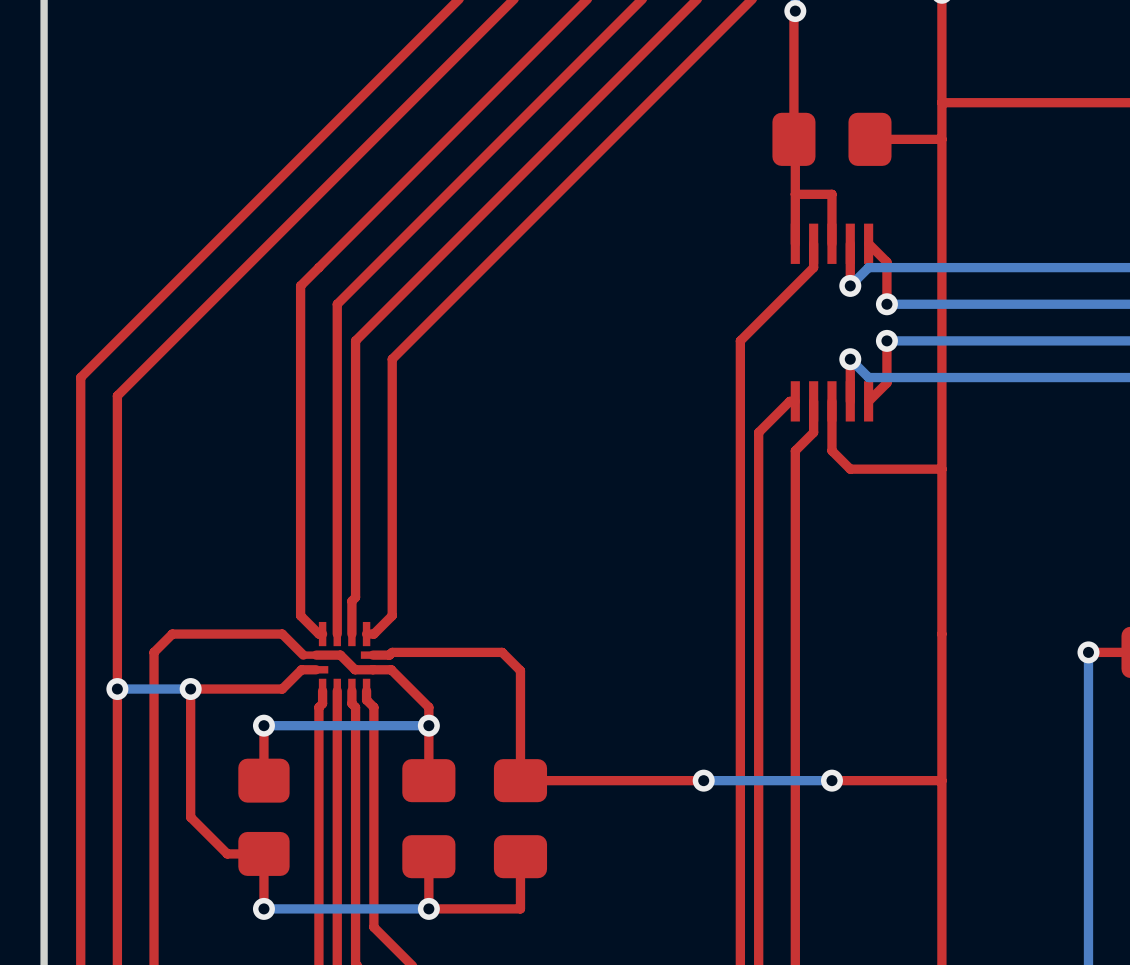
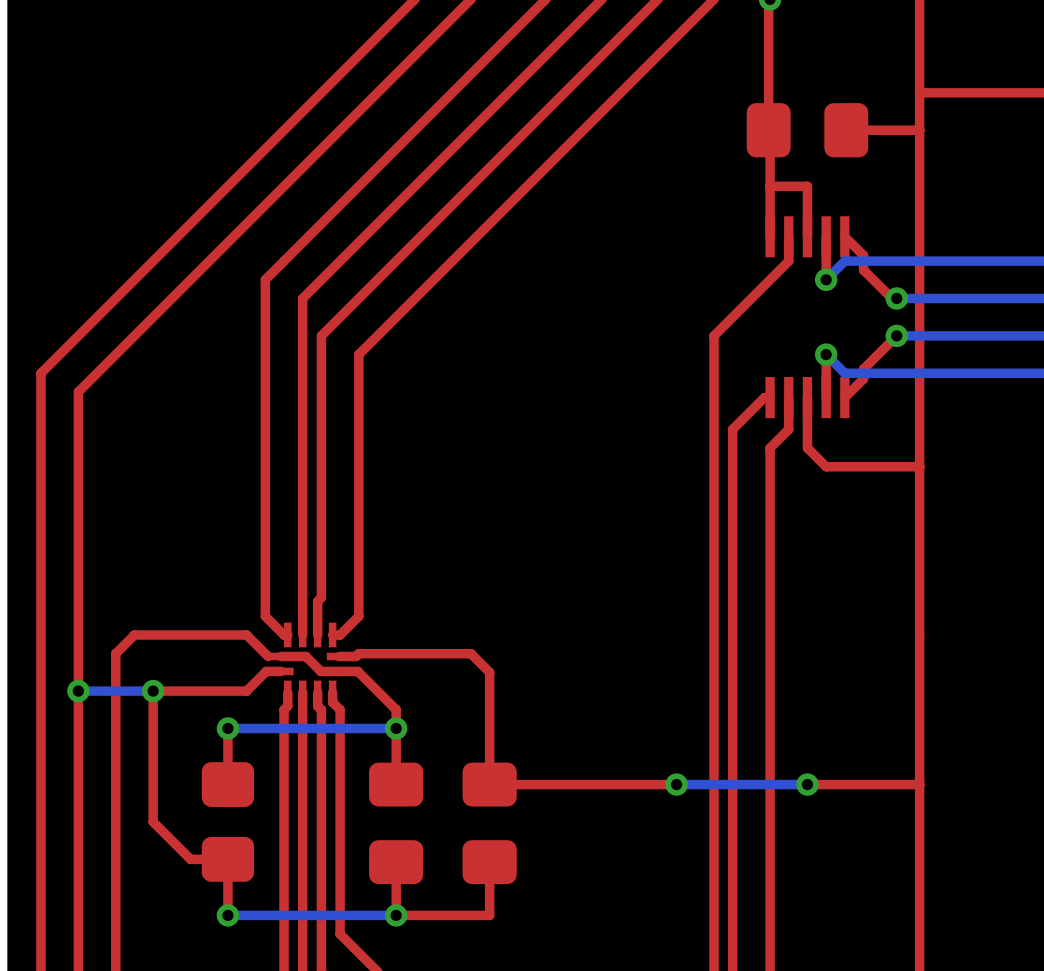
top track: (886, 276) (886, 304) -> (863, 270) (892, 298) (896, 298)
via: (886, 304) -> none
bottom track: (919, 304) (886, 304) -> none
via: none -> (896, 298)
top track: (886, 340) (886, 373) -> (896, 335) (863, 369)
via: (886, 340) -> none
bottom track: (919, 340) (886, 340) -> none
via: none -> (896, 335)

